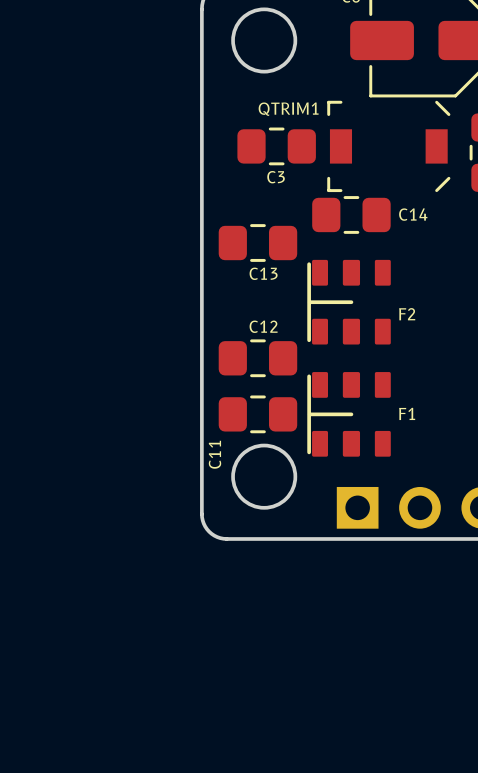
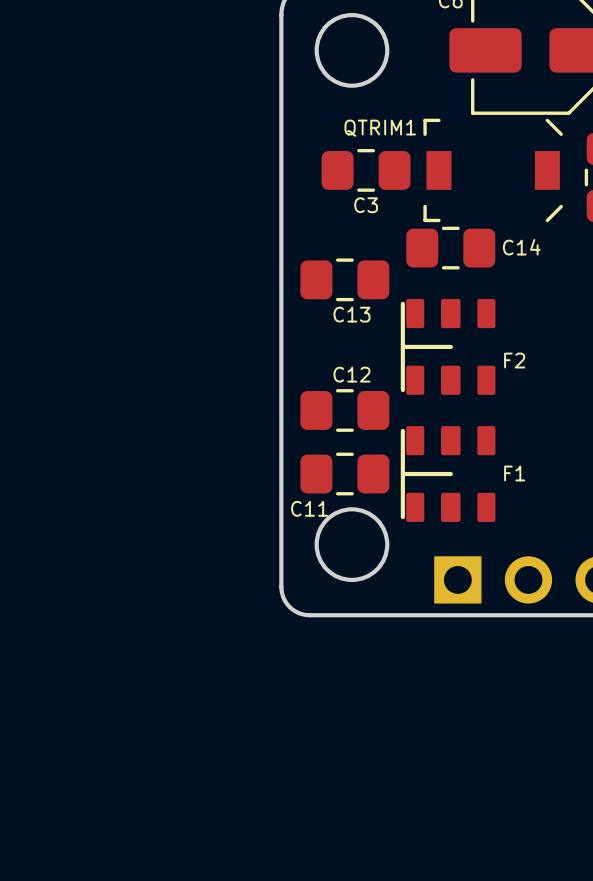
C11 name rotation: 0° (214, 454) -> 90° clockwise (309, 508)

